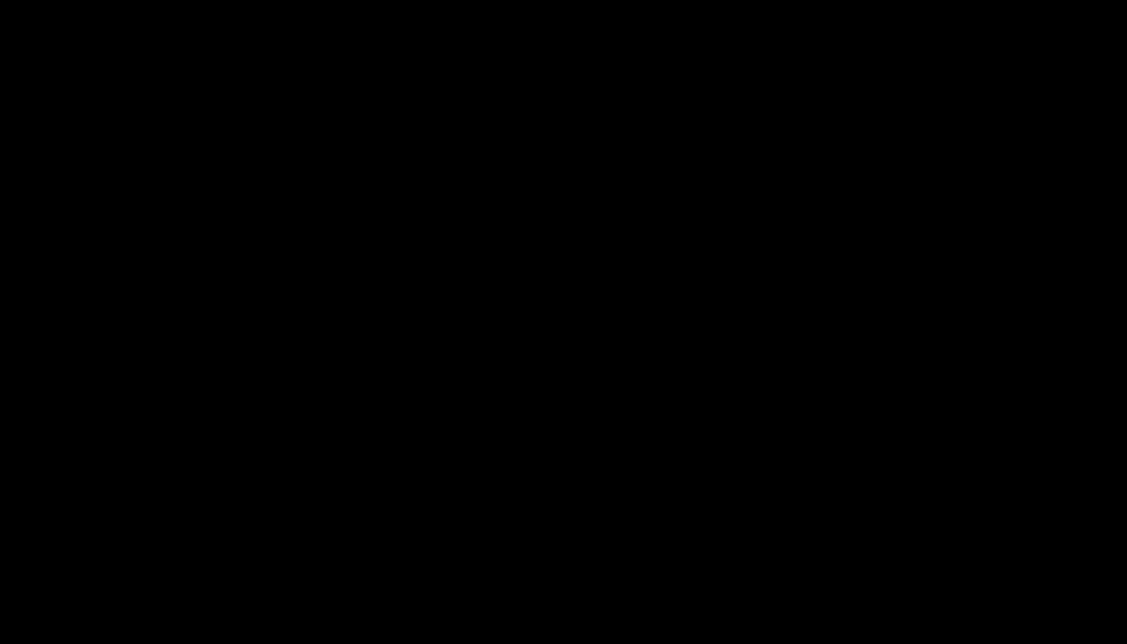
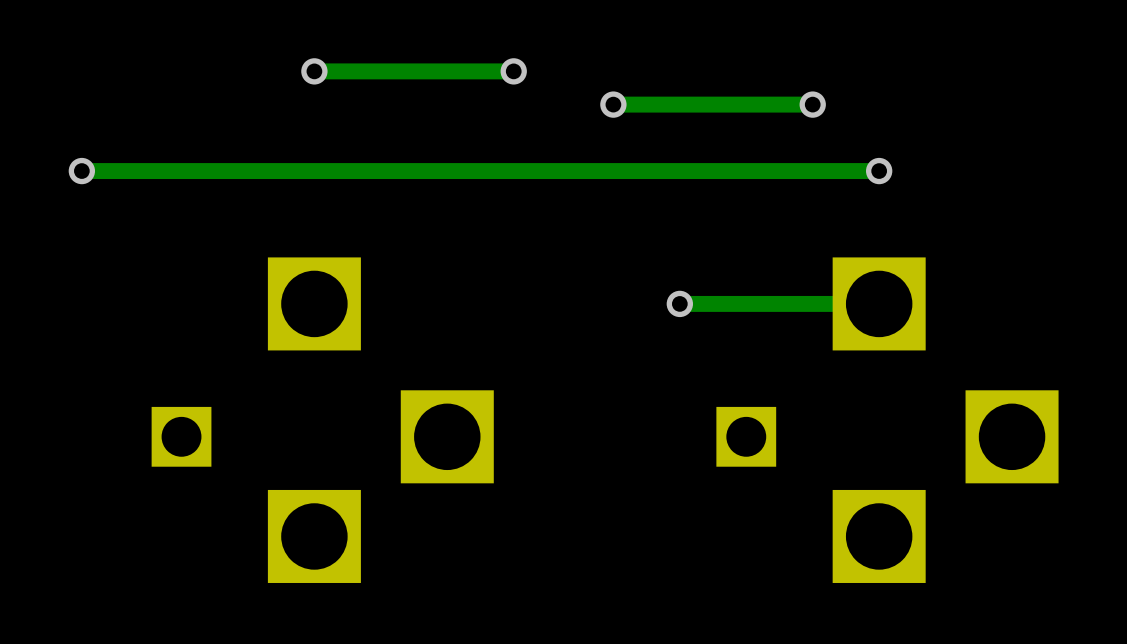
via: none -> (314, 71)
track: none -> (513, 71) (314, 71)
via: none -> (513, 71)
via: none -> (613, 104)
track: none -> (812, 104) (613, 104)
via: none -> (812, 104)
via: none -> (81, 171)
track: none -> (879, 171) (81, 171)
via: none -> (879, 171)
via: none -> (679, 303)
track: none -> (879, 303) (679, 303)
part: none -> (322, 420)
part: none -> (887, 420)

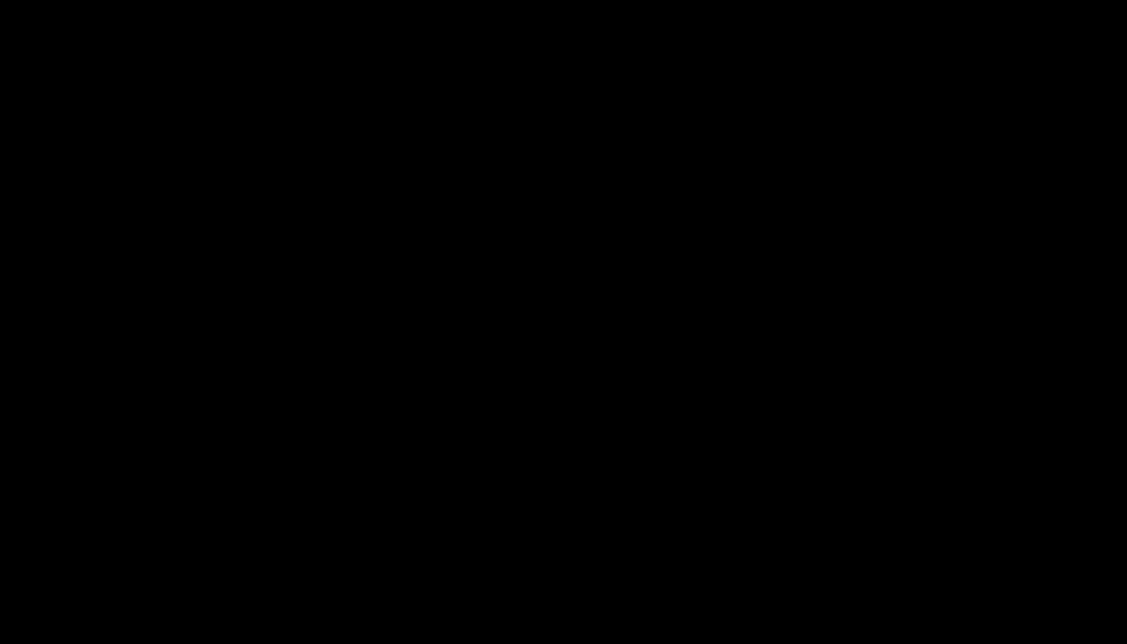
via: (314, 71) -> none
track: (513, 71) (314, 71) -> none
via: (513, 71) -> none
via: (613, 104) -> none
track: (812, 104) (613, 104) -> none
via: (812, 104) -> none
via: (81, 171) -> none
track: (879, 171) (81, 171) -> none
via: (879, 171) -> none
via: (679, 303) -> none
track: (879, 303) (679, 303) -> none
part: (322, 420) -> none
part: (887, 420) -> none

